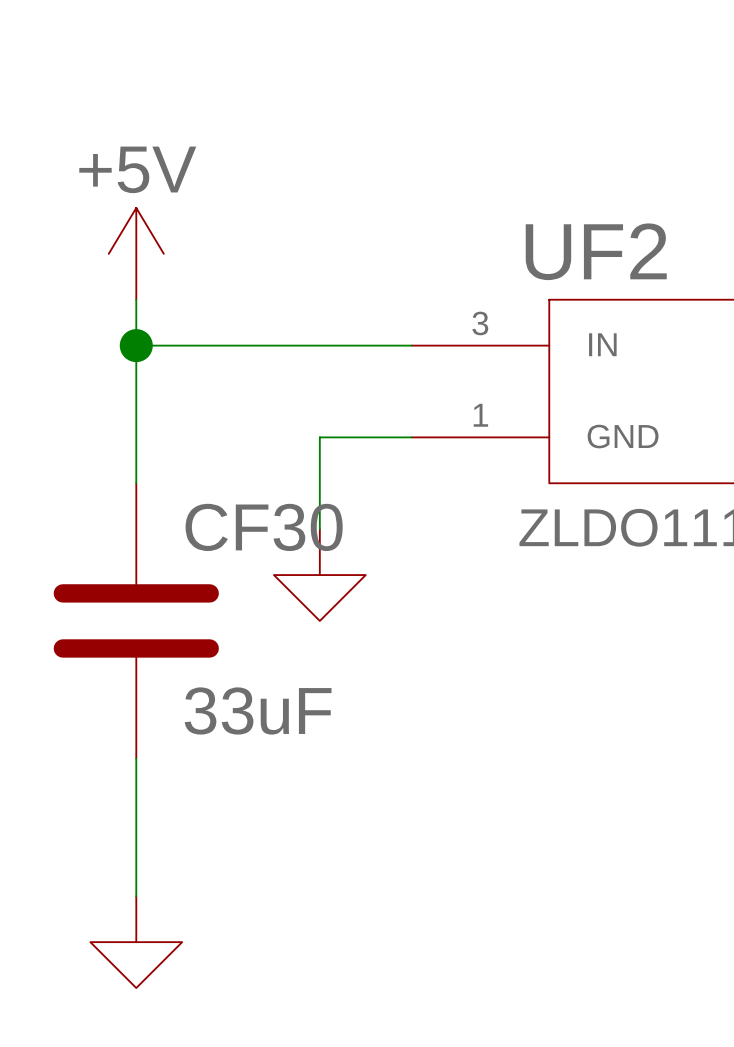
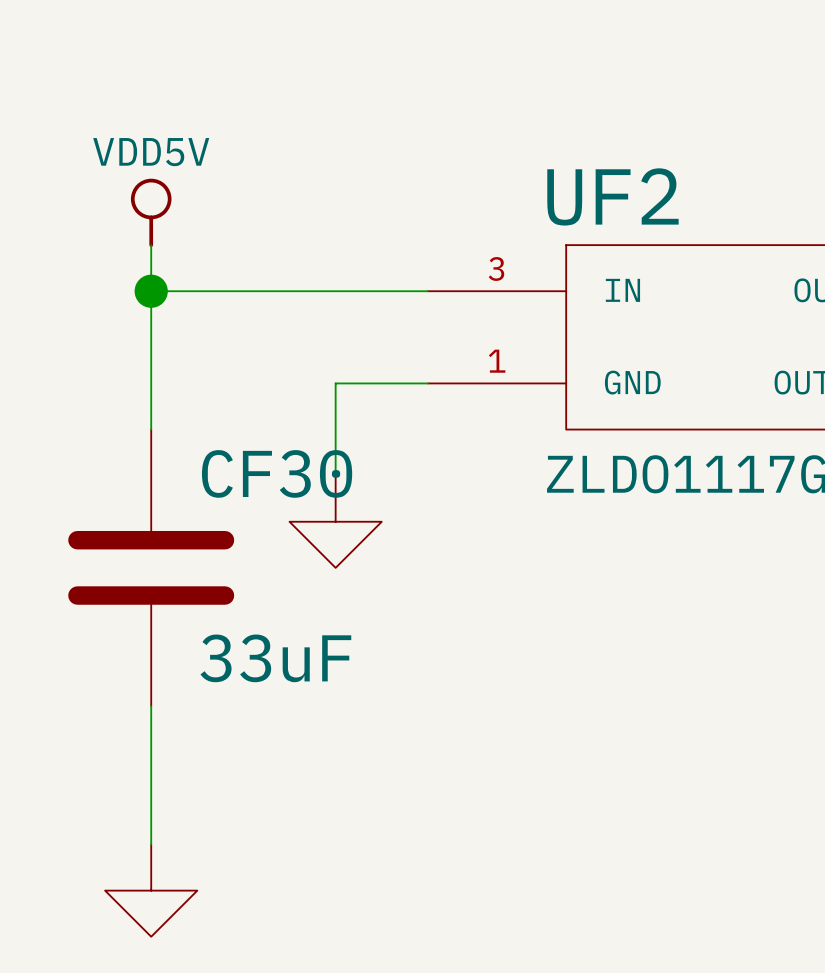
power symbol: +5V (136, 253) -> VDD5V (151, 212)

